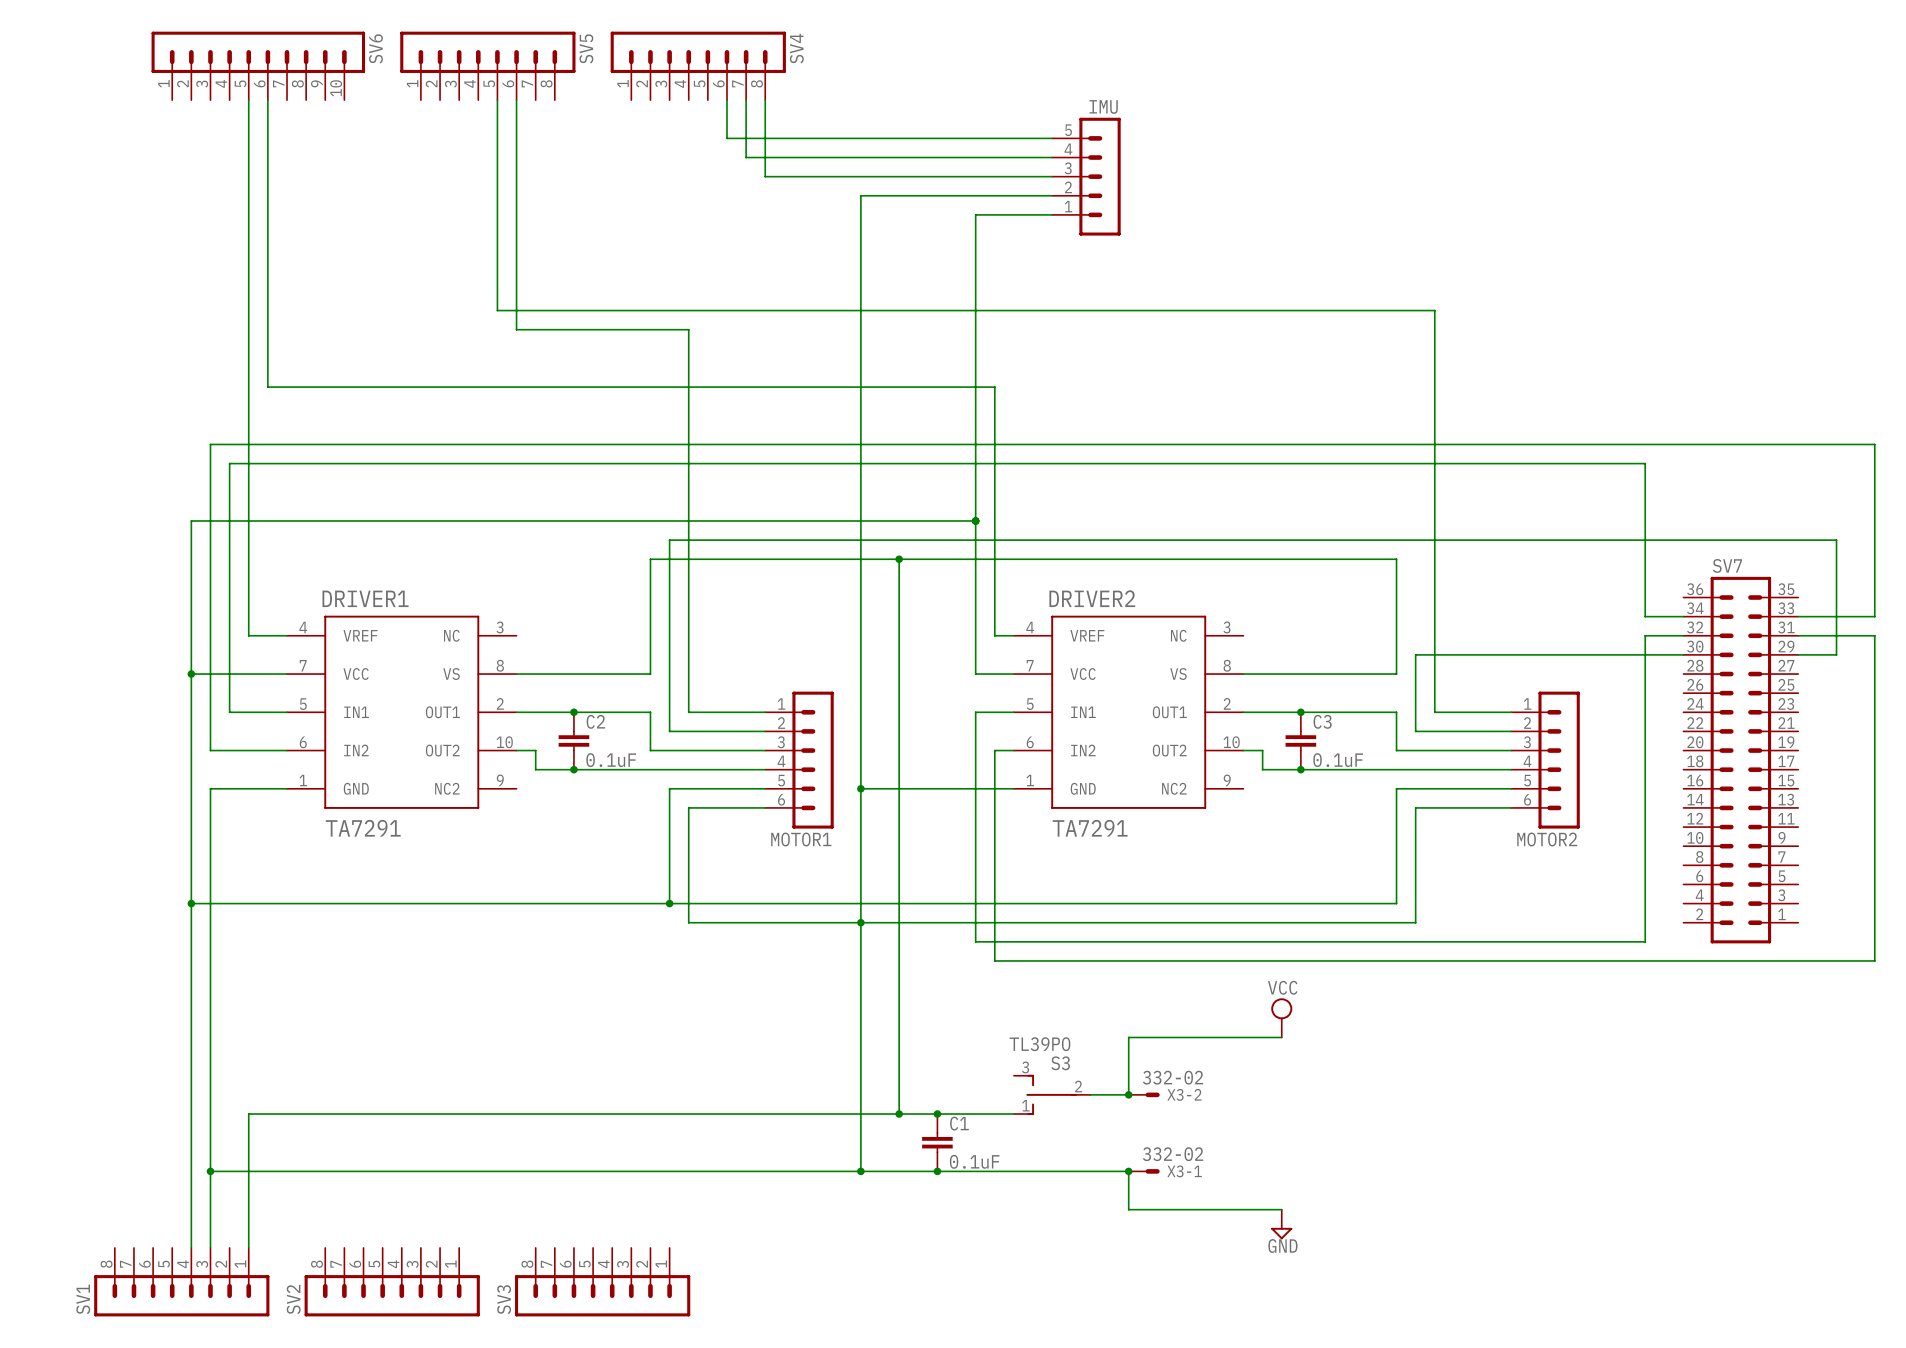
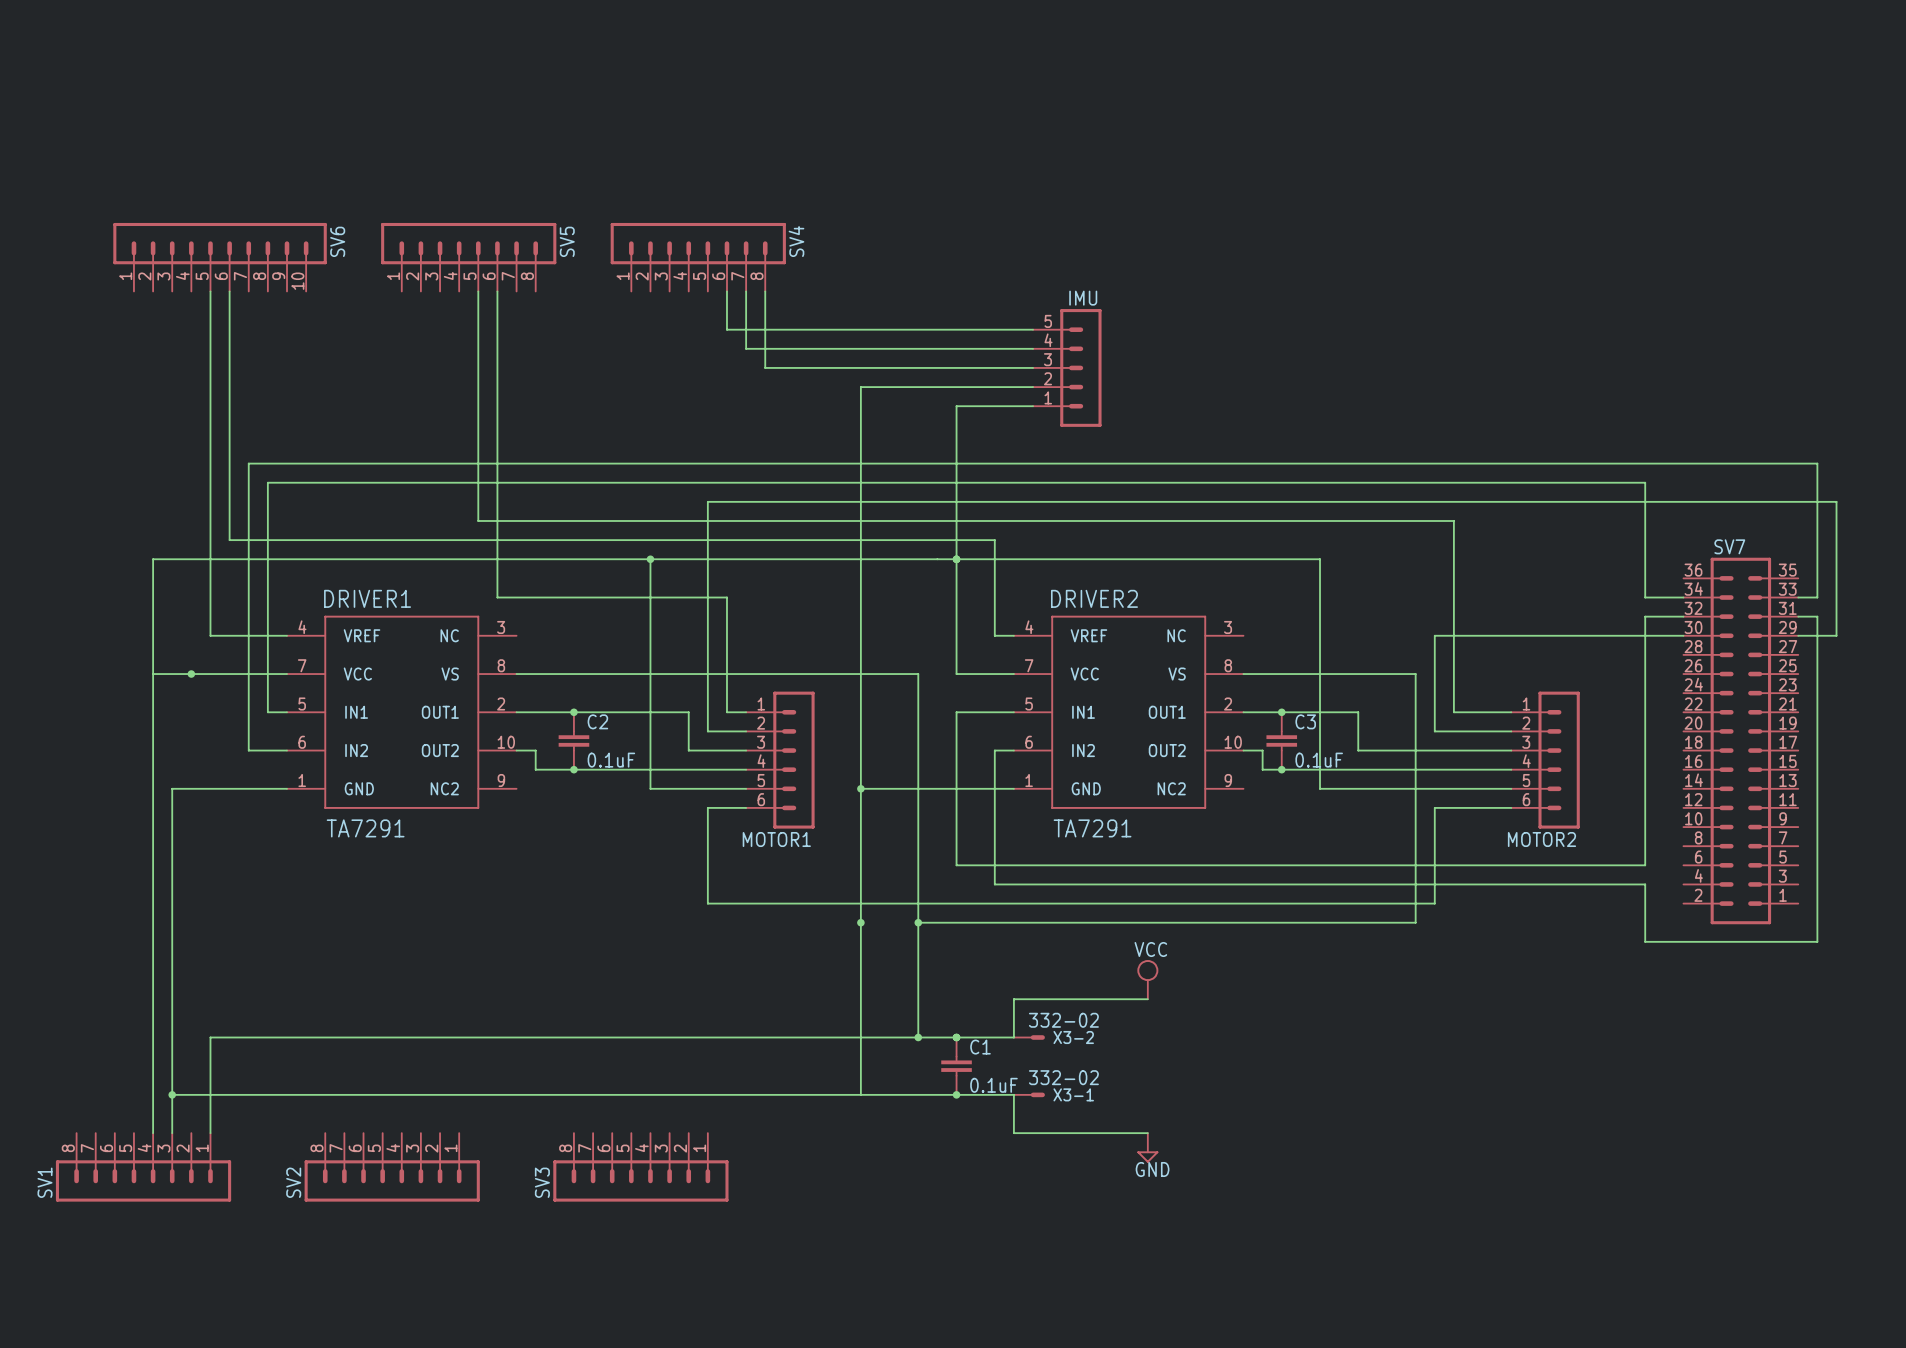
SV6 position: (258, 65) -> (220, 257)
SV5 position: (487, 65) -> (468, 257)
SV4 position: (698, 65) -> (698, 257)
wire: (248, 100) (248, 463) (229, 463) -> (229, 291) (229, 463)
wire: (267, 100) (267, 387) (860, 387) (860, 195) (1052, 195) -> none
wire: (497, 100) (497, 291) -> none
wire: (516, 100) (516, 329) (688, 329) (688, 712) (726, 712) -> (497, 310) (497, 597) (726, 597) (726, 712)
wire: (726, 100) (726, 138) (1052, 138) -> none
wire: (746, 100) (746, 157) (1052, 157) -> none
wire: (765, 100) (765, 176) (1052, 176) -> none
IMU: (1086, 176) -> none
wire: (1052, 214) (975, 214) (975, 674) -> (1033, 406) (956, 406) (956, 674) (975, 674)
wire: none -> (210, 291) (210, 444)
wire: none -> (726, 291) (726, 329) (1033, 329)
wire: none -> (746, 291) (746, 348) (1033, 348)
wire: none -> (765, 291) (765, 367) (1033, 367)
wire: (497, 310) (1434, 310) (1434, 635) -> (1645, 616) (1645, 635) (1434, 635)
IMU: none -> (1067, 367)
wire: (994, 387) (994, 540) (1836, 540) -> (707, 731) (707, 501) (1836, 501) (1836, 540)
wire: none -> (994, 387) (1033, 387)
wire: (210, 444) (1874, 444) (1874, 616) (1817, 616) -> (1645, 941) (1817, 941) (1817, 616)
wire: (1645, 463) (1645, 482) -> (1645, 463) (1817, 463) (1817, 597) (1798, 597)
wire: none -> (1645, 482) (267, 482) (267, 712)
wire: (478, 520) (191, 520) (191, 1247) -> (478, 520) (478, 291)
junction: (975, 520) -> none
wire: (229, 540) (229, 712) (267, 712) -> (229, 540) (669, 540)
wire: (669, 540) (669, 731) (707, 731) -> none
wire: none -> (650, 559) (153, 559) (153, 1133)
junction: none -> (650, 559)
wire: (899, 559) (899, 1114) -> none
junction: (899, 559) -> none
junction: none -> (956, 559)
wire: (1320, 559) (1396, 559) (1396, 674) -> (1320, 559) (1320, 788) (1396, 788)
wire: (1645, 597) (1645, 616) -> (1645, 597) (1683, 597)
wire: (210, 635) (210, 750) (248, 750) -> (210, 635) (248, 635) (248, 750)
wire: (1683, 654) (1415, 654) (1415, 674) -> (1396, 674) (1415, 674)
wire: (1798, 654) (1836, 654) (1836, 635) (1874, 635) (1874, 960) (994, 960) (994, 884) -> (1645, 884) (994, 884)
wire: none -> (153, 674) (191, 674)
wire: (975, 712) (975, 941) (1645, 941) -> (975, 712) (956, 712) (956, 865) (1645, 865)
junction position: (1300, 712) -> (1281, 712)
wire: (1358, 712) (1396, 712) (1396, 750) -> (1358, 712) (1358, 750) (1396, 750)
wire: (1434, 712) (1453, 712) -> (975, 520) (1453, 520) (1453, 712)
wire: (1415, 731) (1434, 731) -> (1434, 712) (1434, 731)
C3 position: (1300, 740) -> (1281, 740)
wire: (650, 750) (688, 750) -> (650, 750) (650, 788) (669, 788)
wire: none -> (688, 750) (688, 712) (650, 712) (650, 674) (918, 674) (918, 1037)
MOTOR1 position: (799, 760) -> (780, 760)
SV7 position: (1740, 760) -> (1740, 740)
junction position: (1300, 769) -> (1281, 769)
wire: (210, 788) (210, 1037) -> (210, 788) (172, 788) (172, 1133)
wire: (669, 788) (669, 903) -> none
wire: (1396, 788) (1396, 903) -> (1434, 807) (1434, 903) (1396, 903)
wire: (707, 807) (688, 807) (688, 922) (918, 922) -> (707, 807) (707, 903)
wire: (1415, 807) (1434, 807) -> (1415, 807) (1415, 731)
wire: (1645, 865) (1645, 884) -> none
wire: (191, 903) (707, 903) -> none
junction: (191, 903) -> none
junction: (669, 903) -> none
junction: none -> (918, 922)
wire: none -> (1147, 999) (1013, 999) (1013, 1037) (210, 1037)
power symbol position: VCC (1281, 1017) -> VCC (1147, 979)
junction: none -> (918, 1037)
junction: none -> (956, 1037)
wire: (1281, 1037) (1128, 1037) (1128, 1094) (1090, 1094) -> none
wire: none -> (172, 1094) (1013, 1094) (1013, 1133) (1147, 1133)
junction: none -> (172, 1094)
wire: (860, 1094) (860, 1171) -> none
S3: TL39PO (1052, 1094) -> none
junction: (1128, 1094) -> none
X3-2 position: (1144, 1094) -> (1029, 1037)
junction: (899, 1114) -> none
junction position: (937, 1114) -> (956, 1094)
wire: (1013, 1114) (248, 1114) (248, 1247) -> none
wire: (210, 1133) (210, 1247) -> none
C1 position: (937, 1142) -> (956, 1066)
wire: (210, 1171) (1128, 1171) (1128, 1209) (1281, 1209) -> none
junction: (210, 1171) -> none
junction: (860, 1171) -> none
junction: (937, 1171) -> none
junction: (1128, 1171) -> none
X3-1 position: (1144, 1171) -> (1029, 1094)
power symbol position: GND (1281, 1224) -> GND (1147, 1147)
SV1 position: (181, 1282) -> (143, 1167)
SV2 position: (392, 1282) -> (392, 1167)
SV3 position: (602, 1282) -> (640, 1167)

